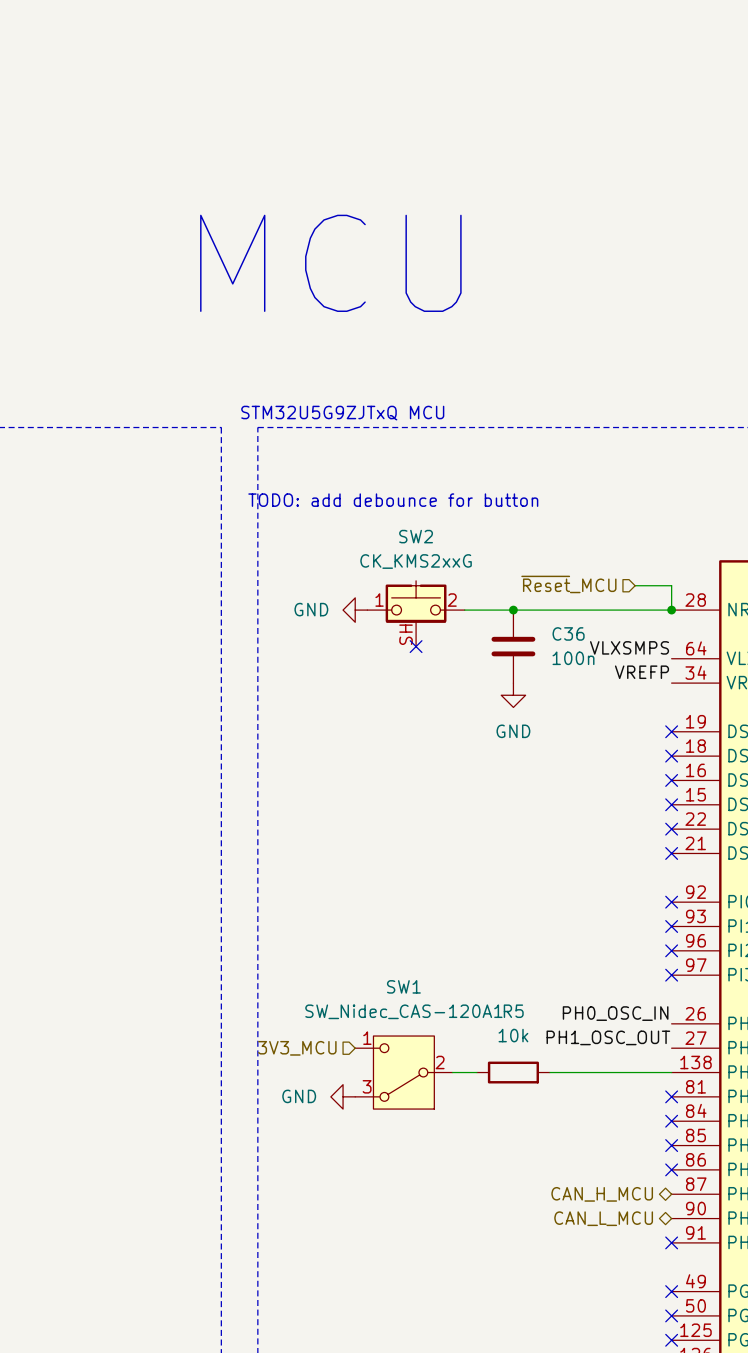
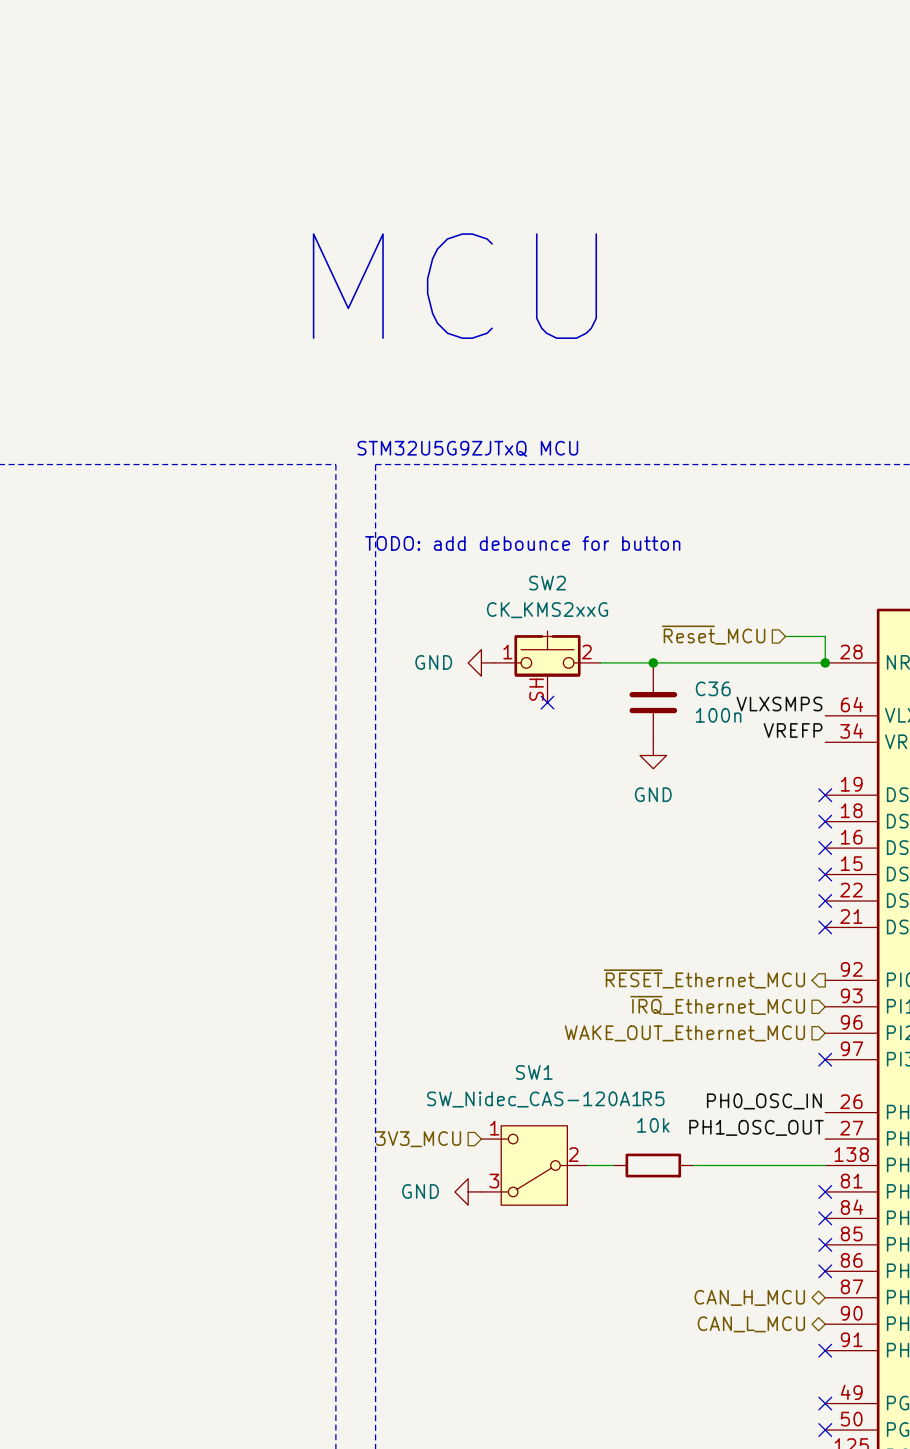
hierarchical label: none -> ~{RESET}_Ethernet_MCU (704, 978)
no-connect mark: (671, 902) -> none
hierarchical label: none -> ~{IRQ}_Ethernet_MCU (717, 1005)
no-connect mark: (671, 926) -> none
hierarchical label: none -> WAKE_OUT_Ethernet_MCU (684, 1033)
no-connect mark: (671, 950) -> none

